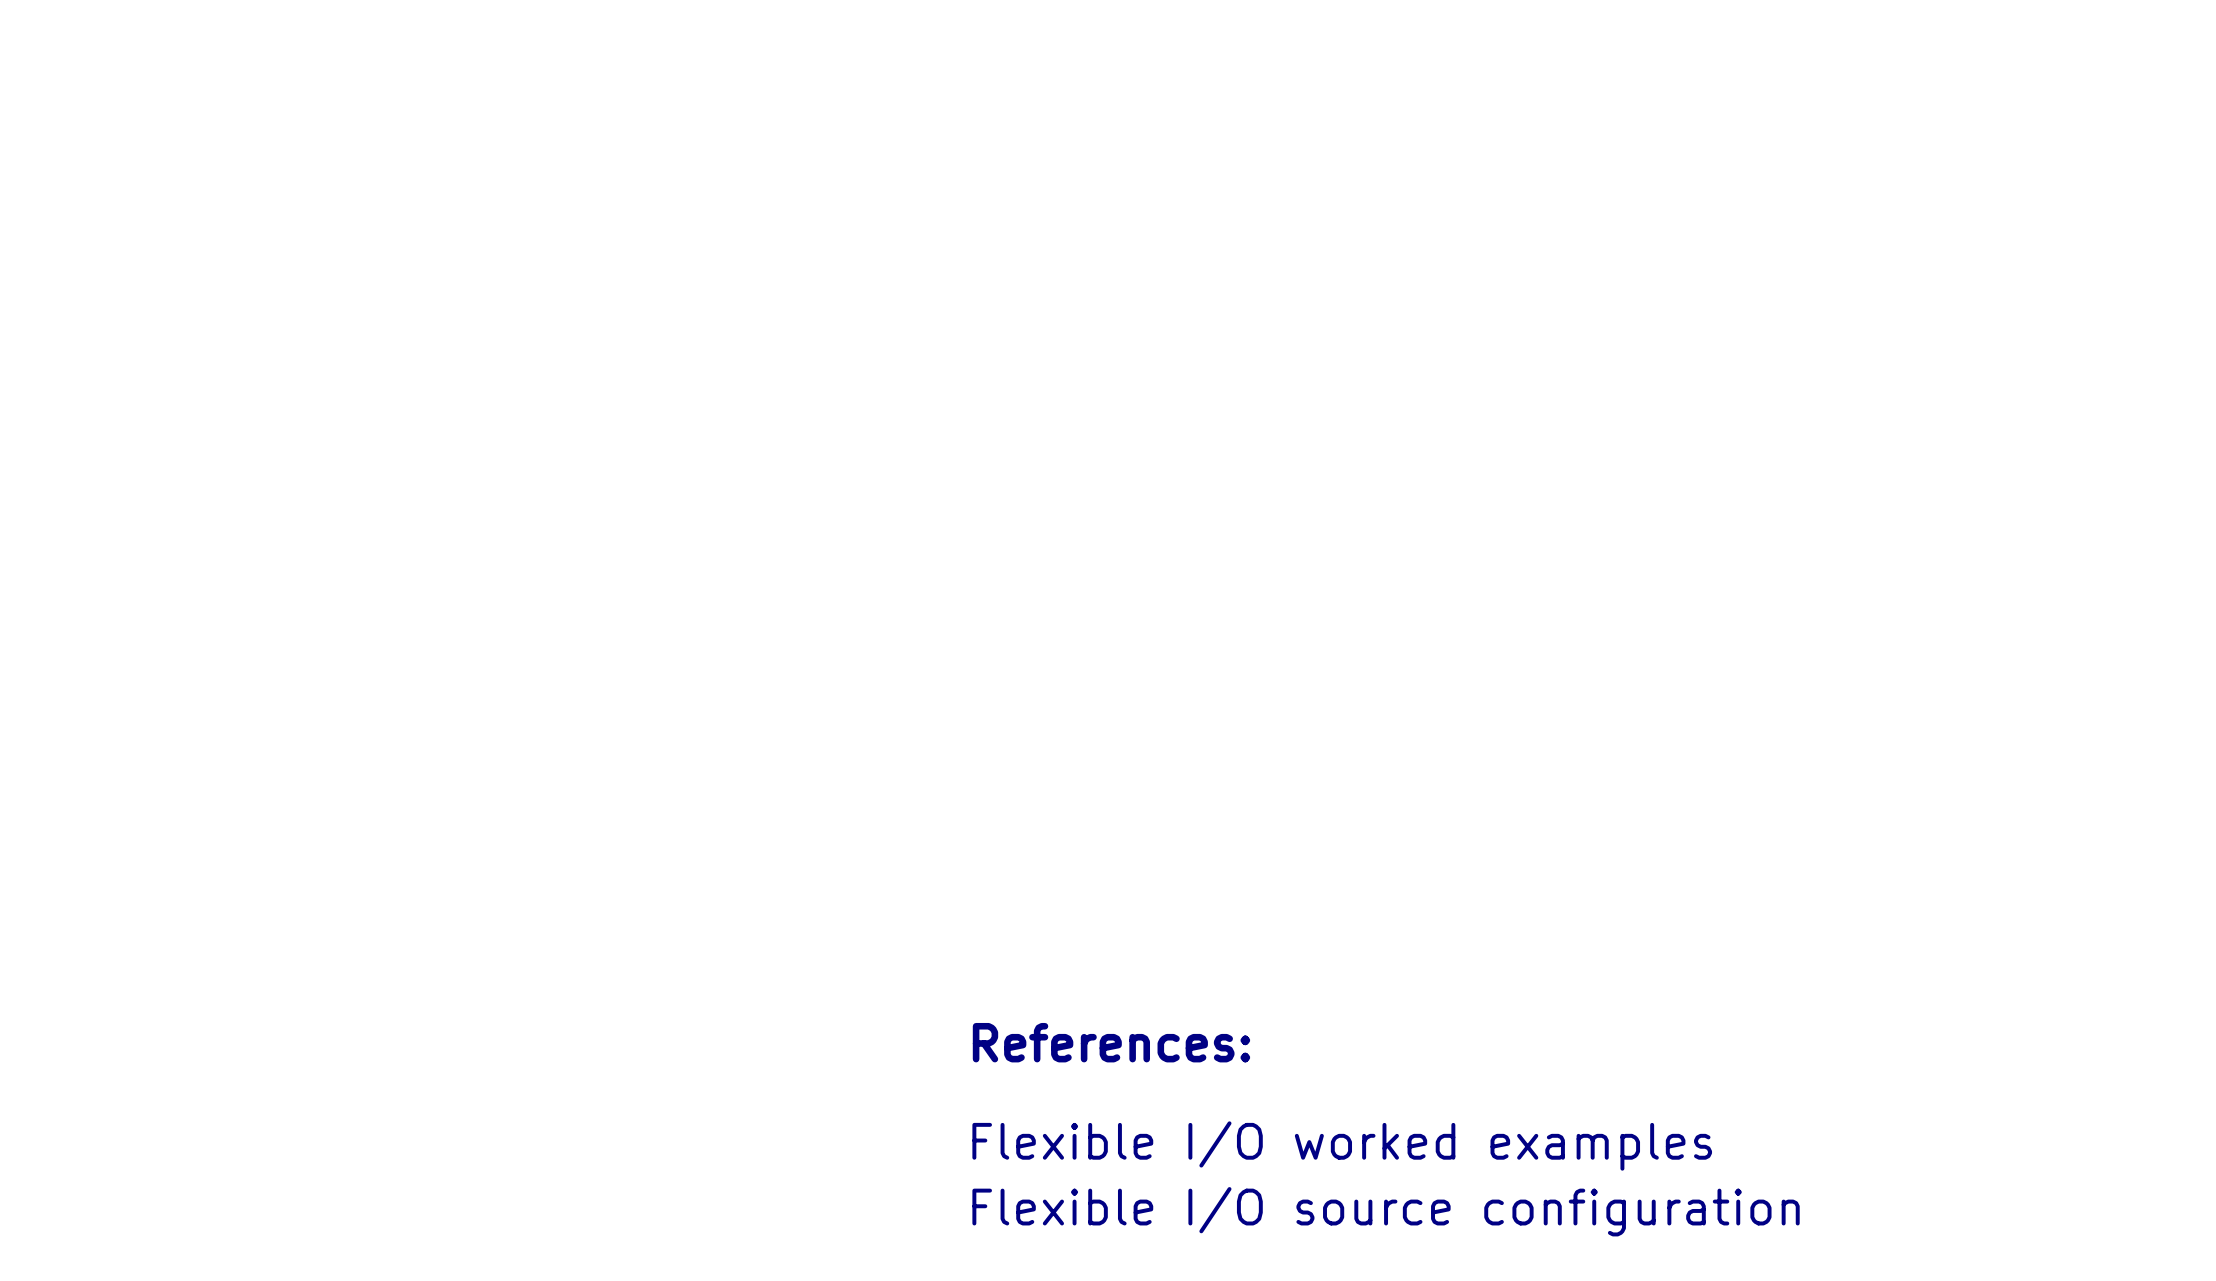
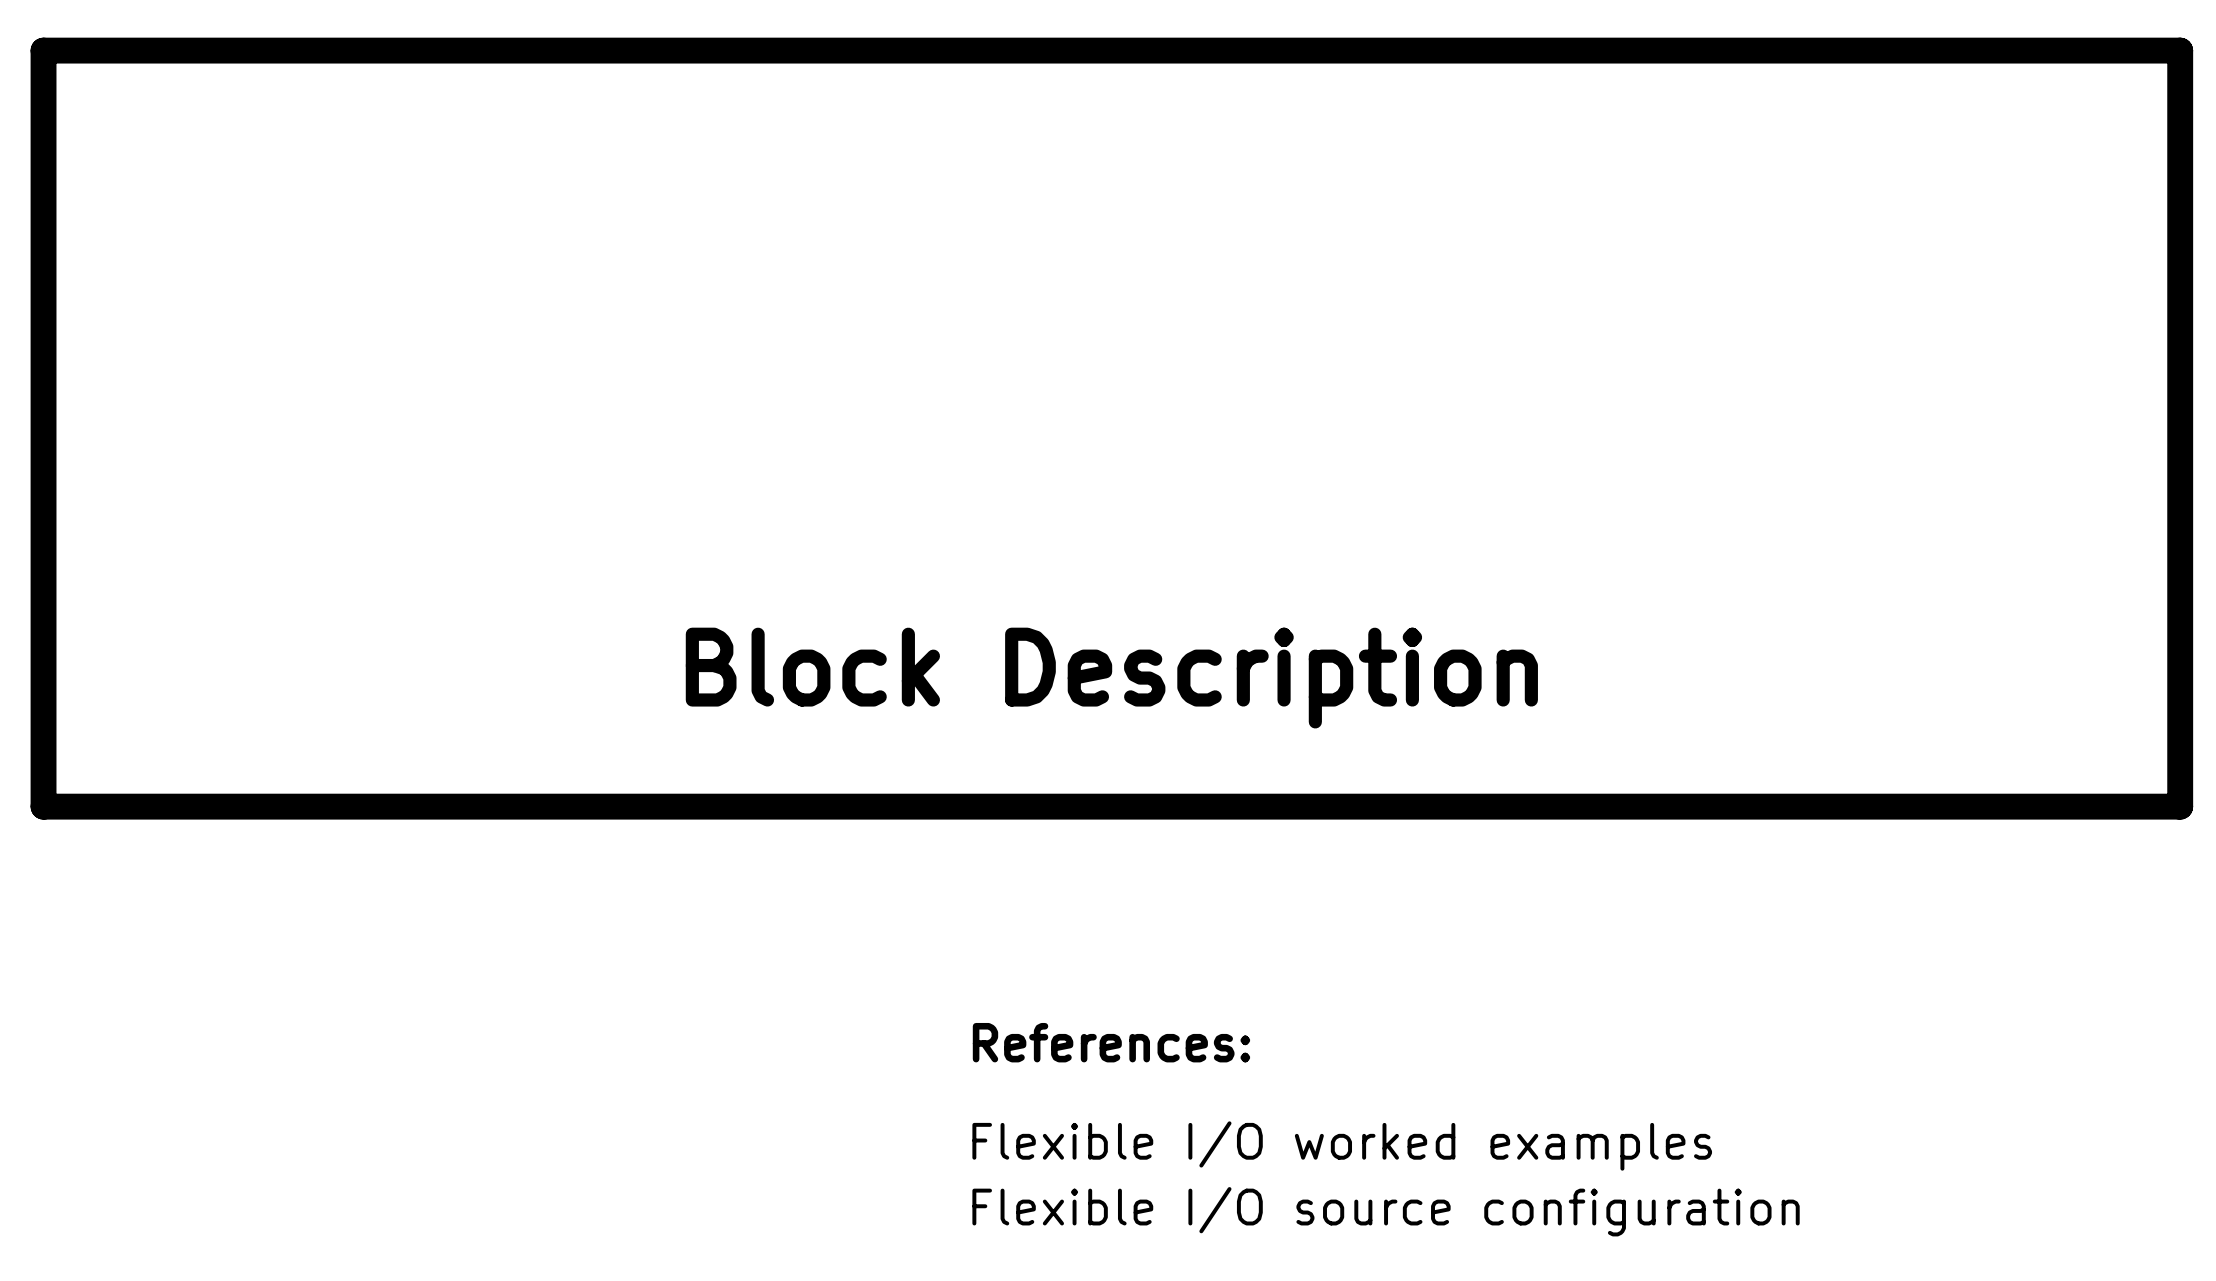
line: none -> (43, 50) (2180, 50) (2180, 806) (43, 806) (43, 50)
text: none -> Block Description (1111, 678)

